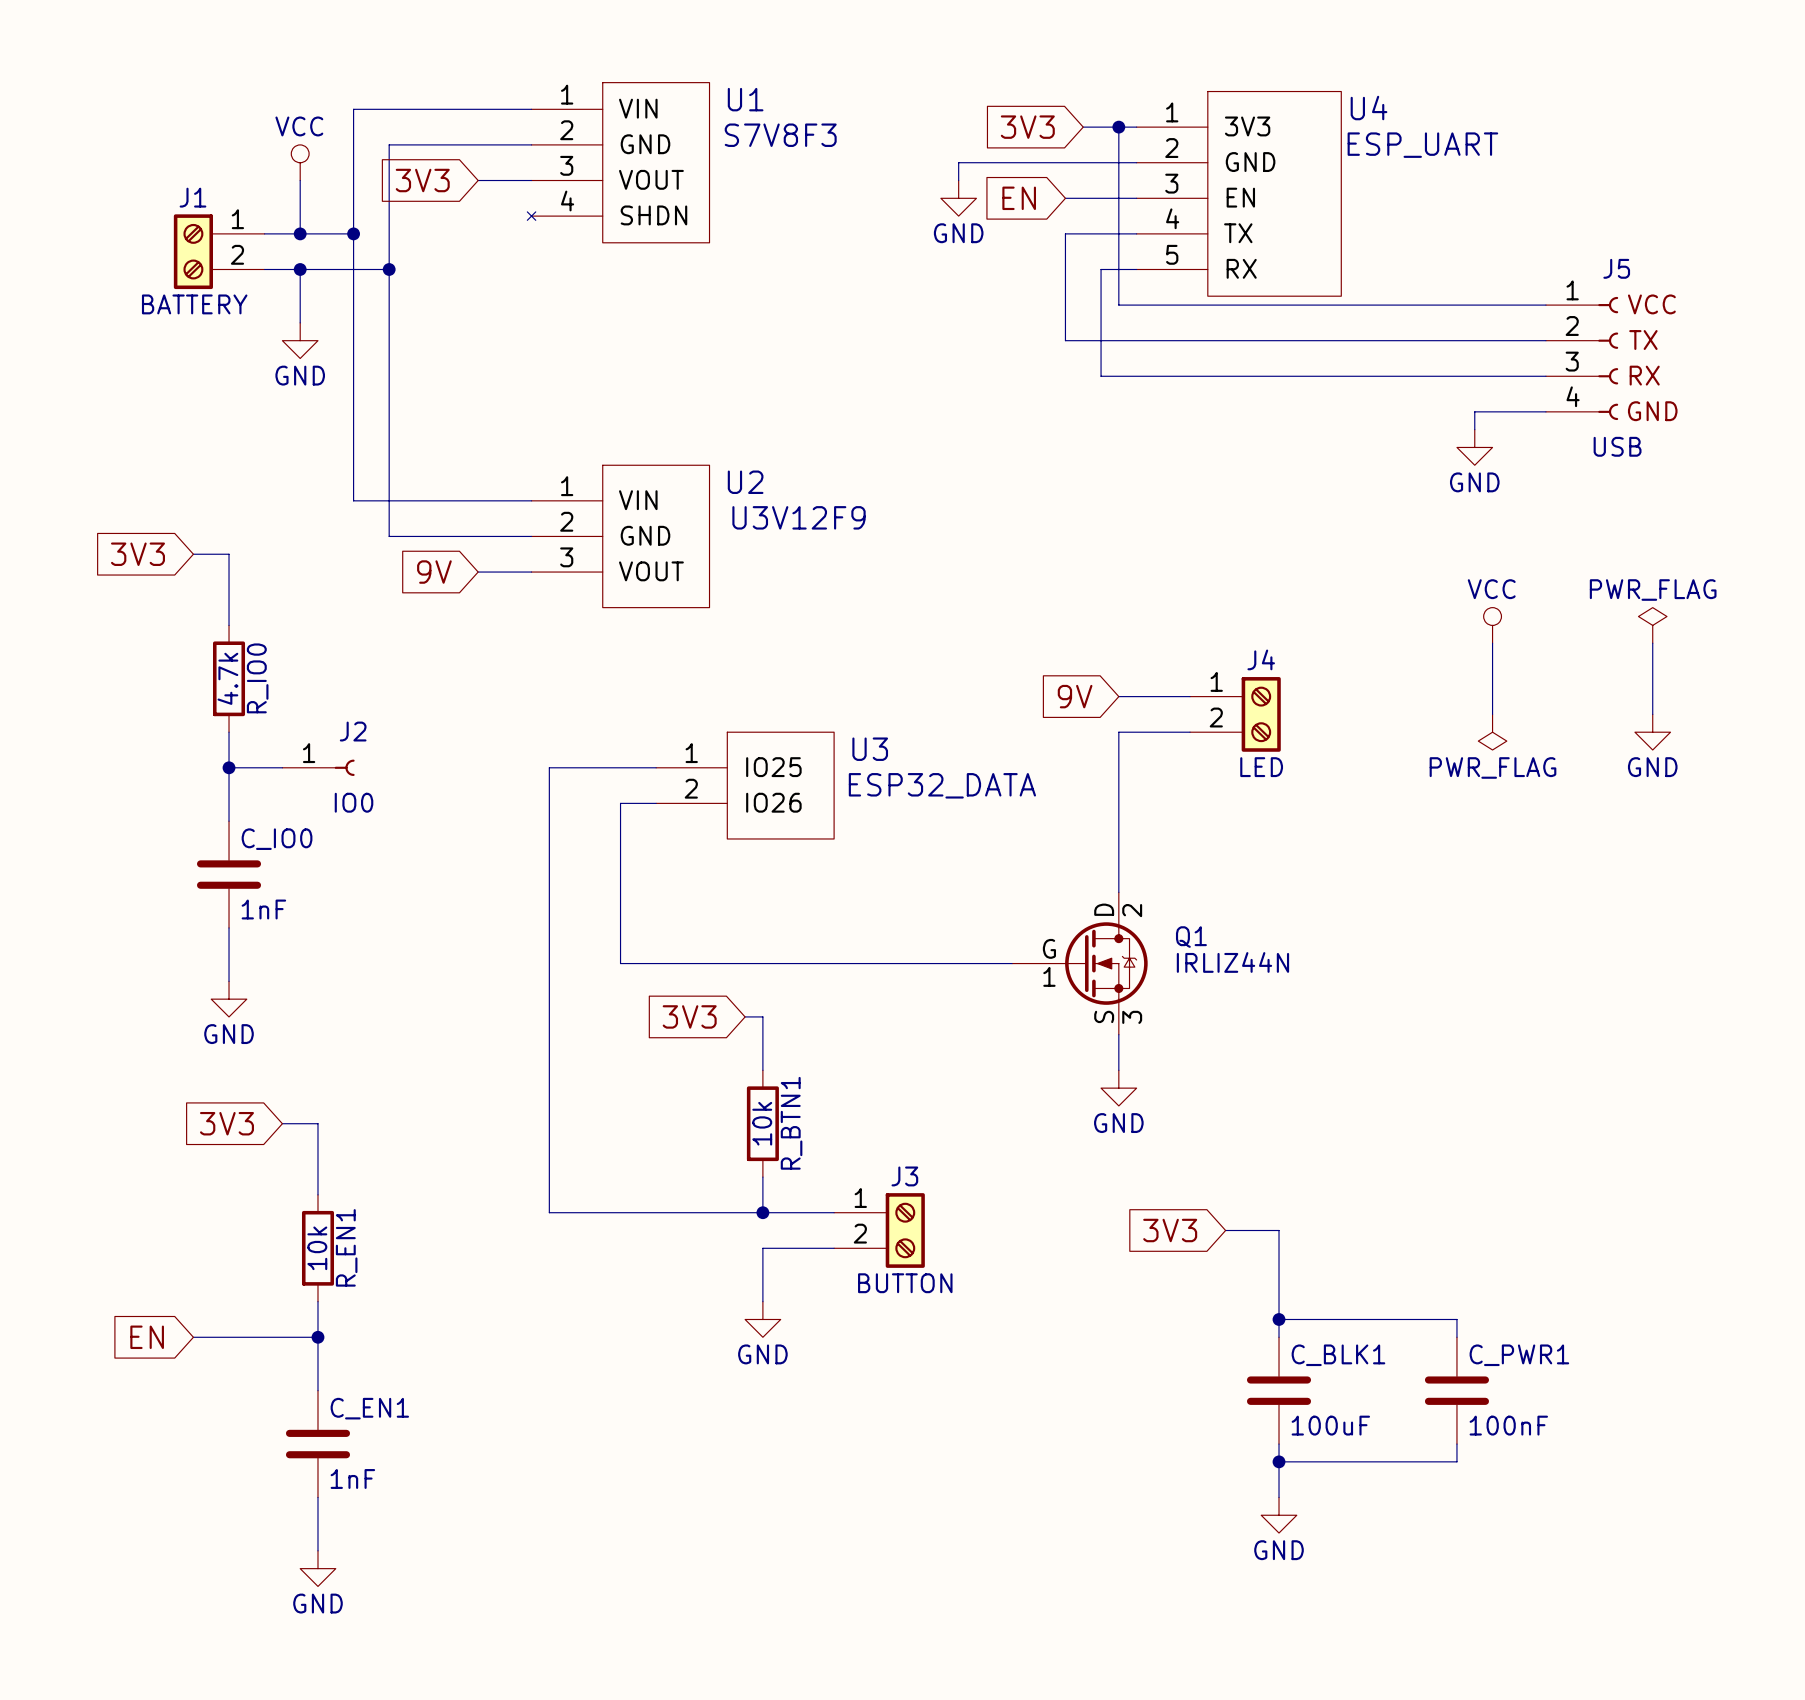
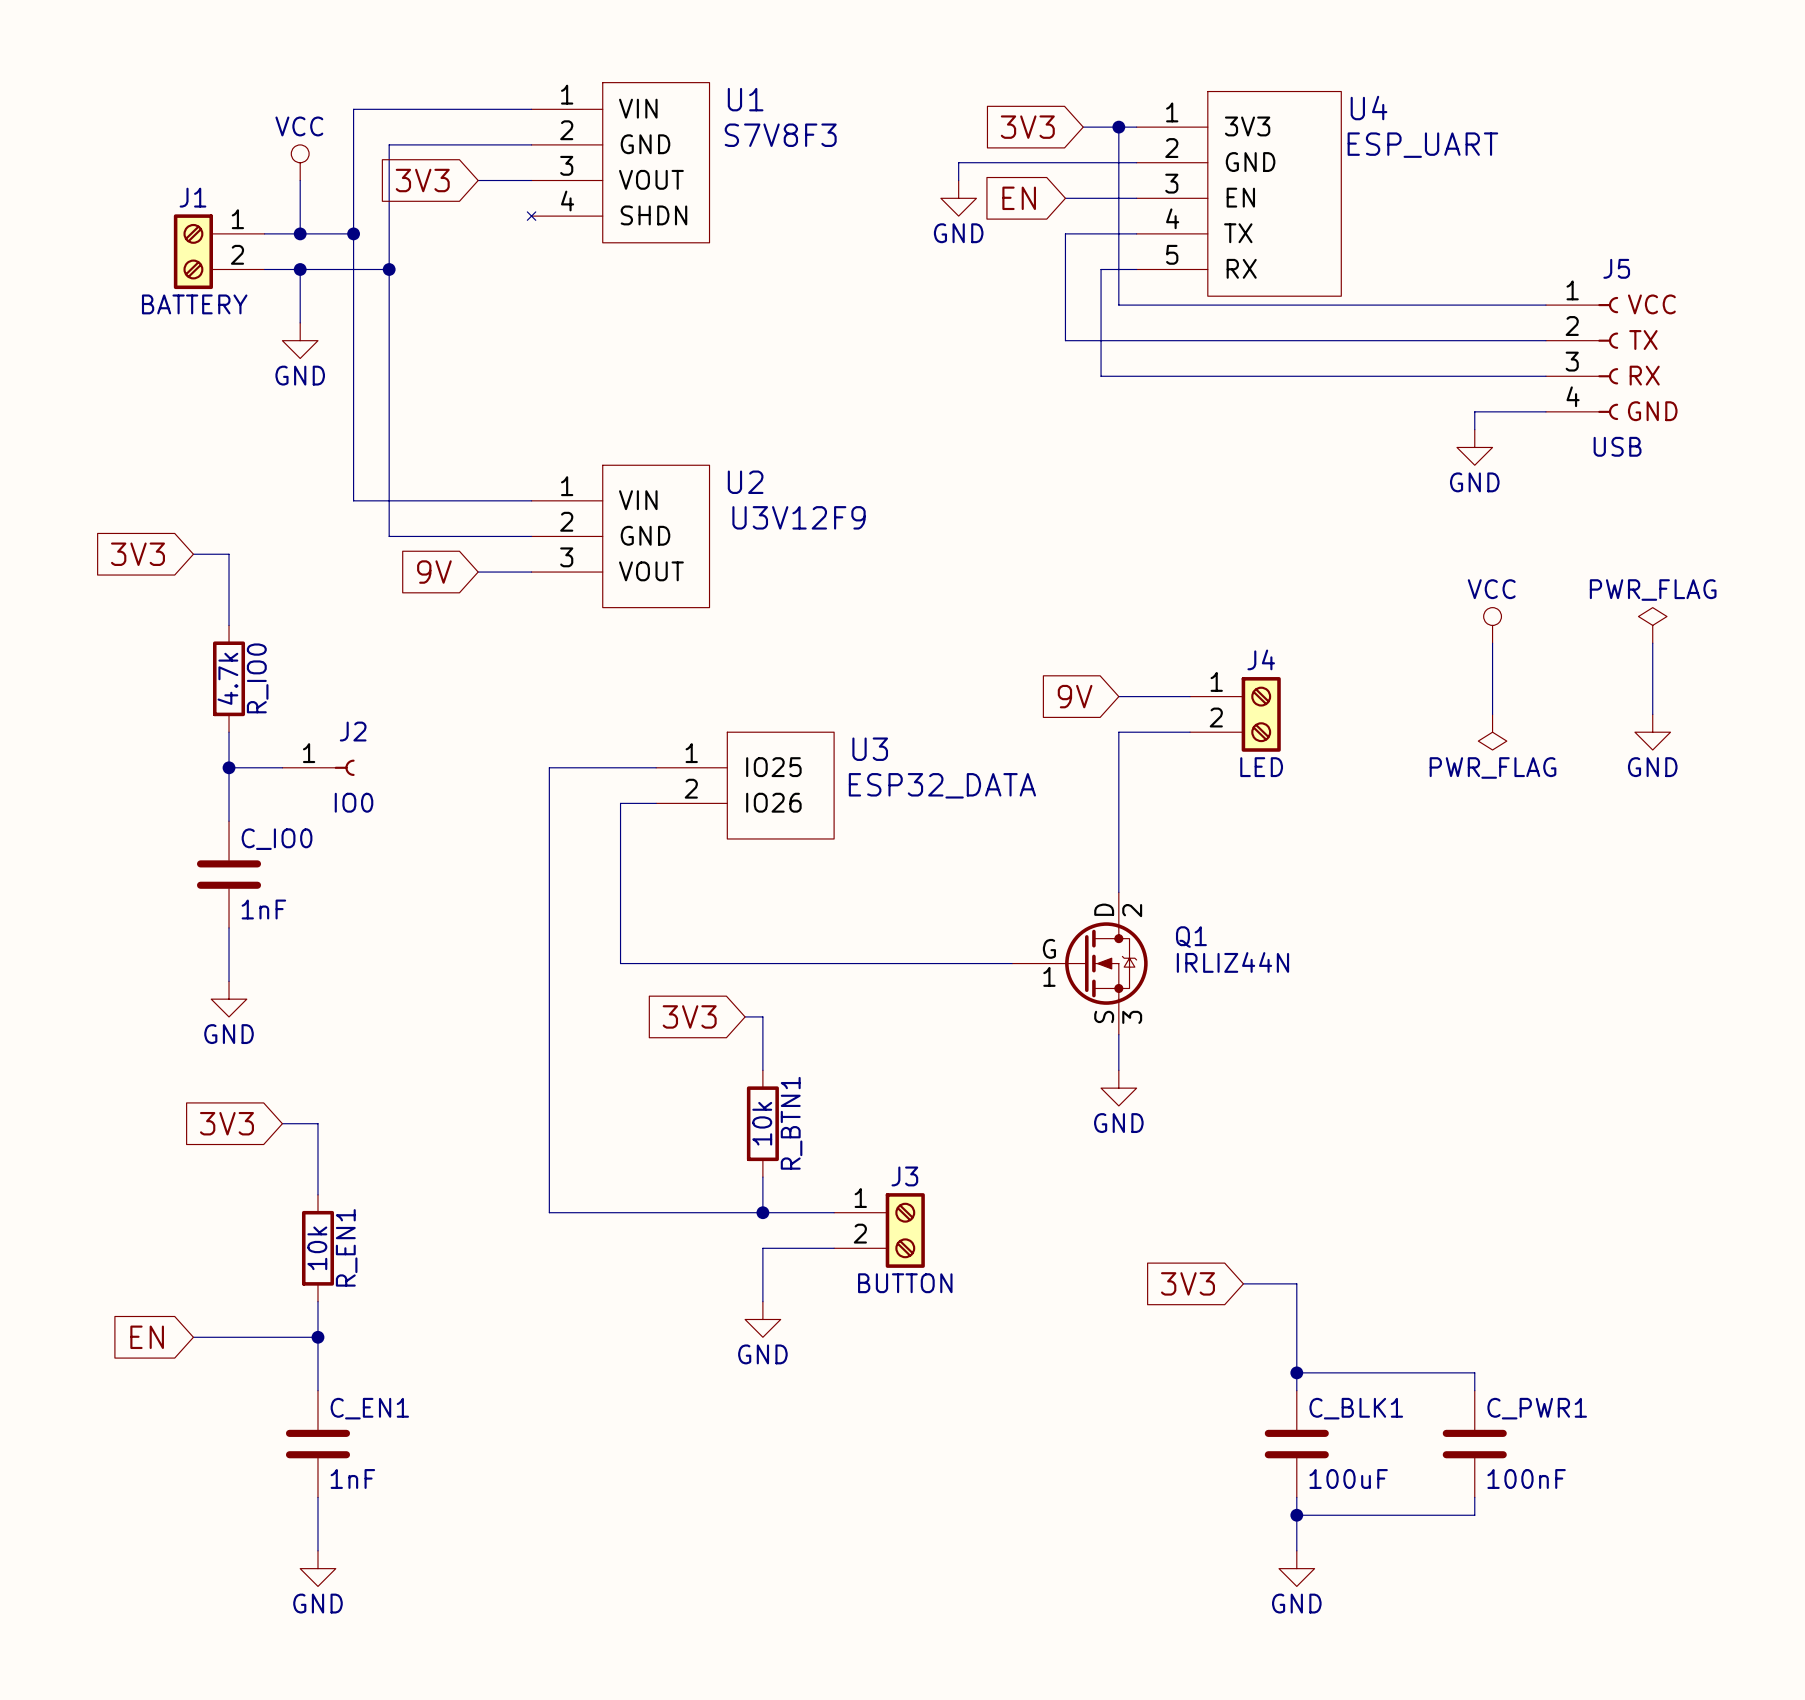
global label position: 3V3 (1170, 1230) -> 3V3 (1187, 1283)
wire: (1225, 1230) (1279, 1230) (1279, 1337) -> (1243, 1283) (1296, 1283) (1296, 1390)
wire: (1279, 1319) (1456, 1319) (1456, 1337) -> (1296, 1372) (1474, 1372) (1474, 1390)
junction: (1279, 1319) -> none
junction: none -> (1296, 1372)
C_BLK1 position: (1279, 1390) -> (1296, 1444)
C_PWR1 position: (1456, 1390) -> (1474, 1444)
wire: (1279, 1444) (1279, 1497) -> (1296, 1497) (1296, 1550)
wire: (1456, 1444) (1456, 1461) (1279, 1461) -> (1474, 1497) (1474, 1515) (1296, 1515)
junction: (1279, 1461) -> none
power symbol position: GND (1279, 1515) -> GND (1296, 1568)
junction: none -> (1296, 1515)

